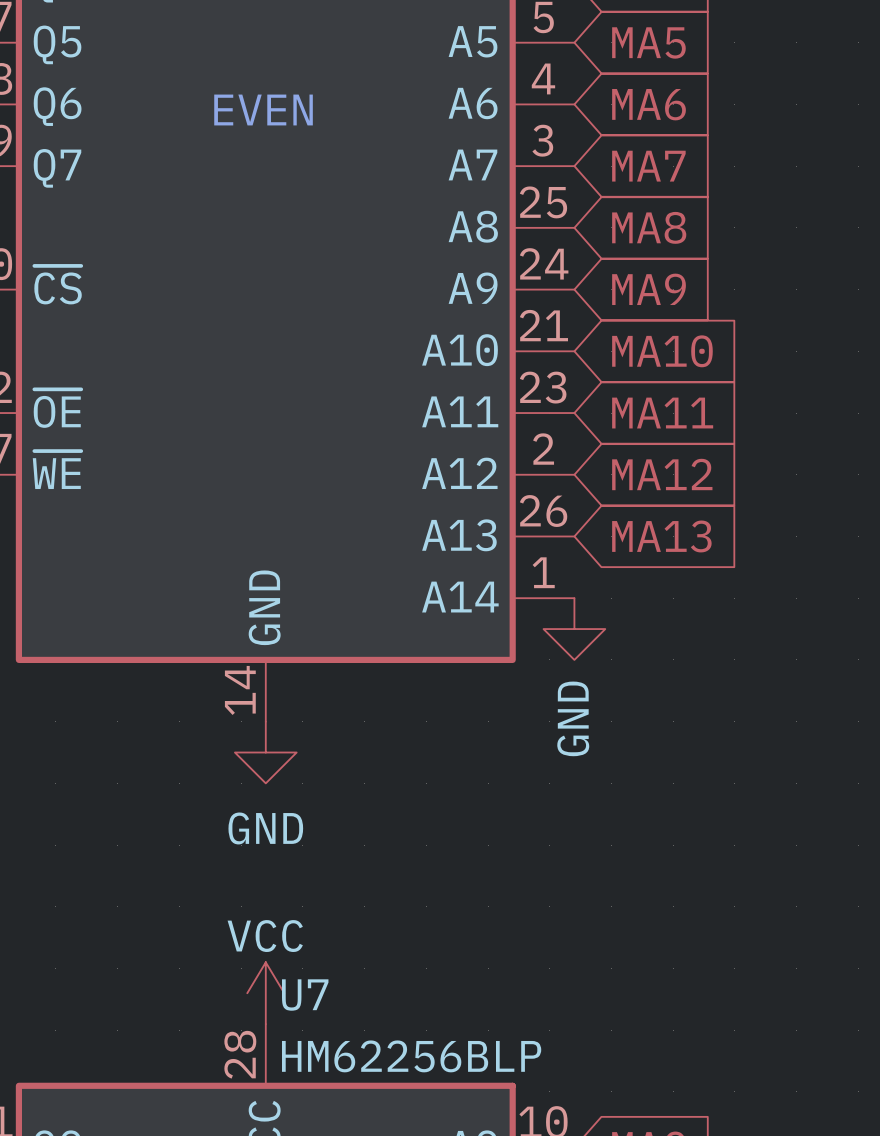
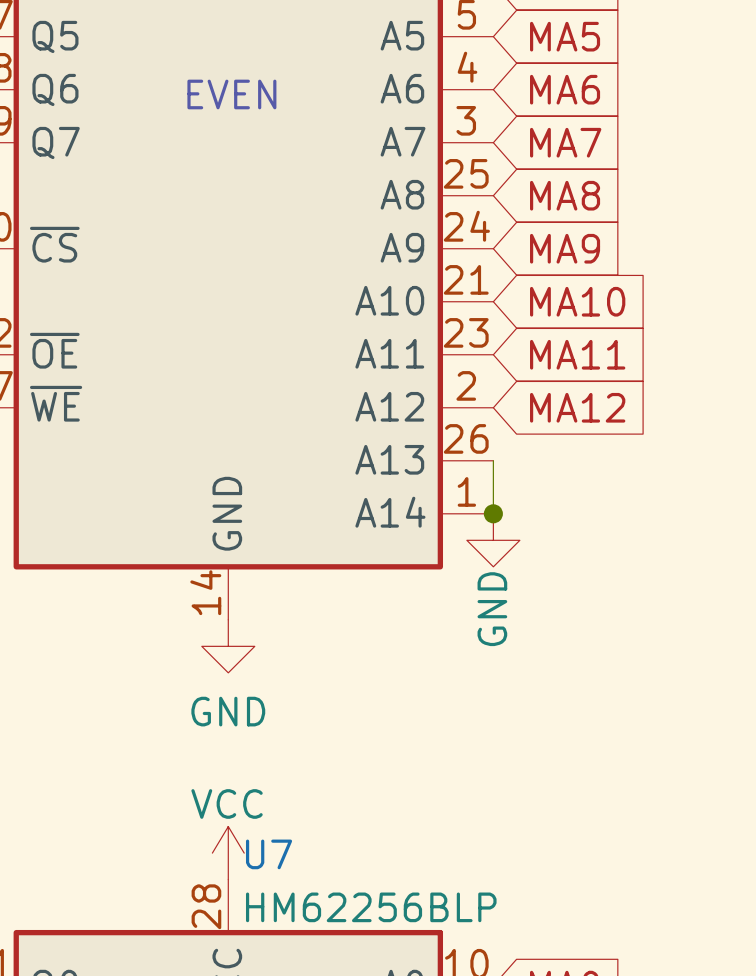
wire: none -> (493, 460) (493, 513)
global label: MA13 (661, 536) -> none
junction: none -> (493, 513)

